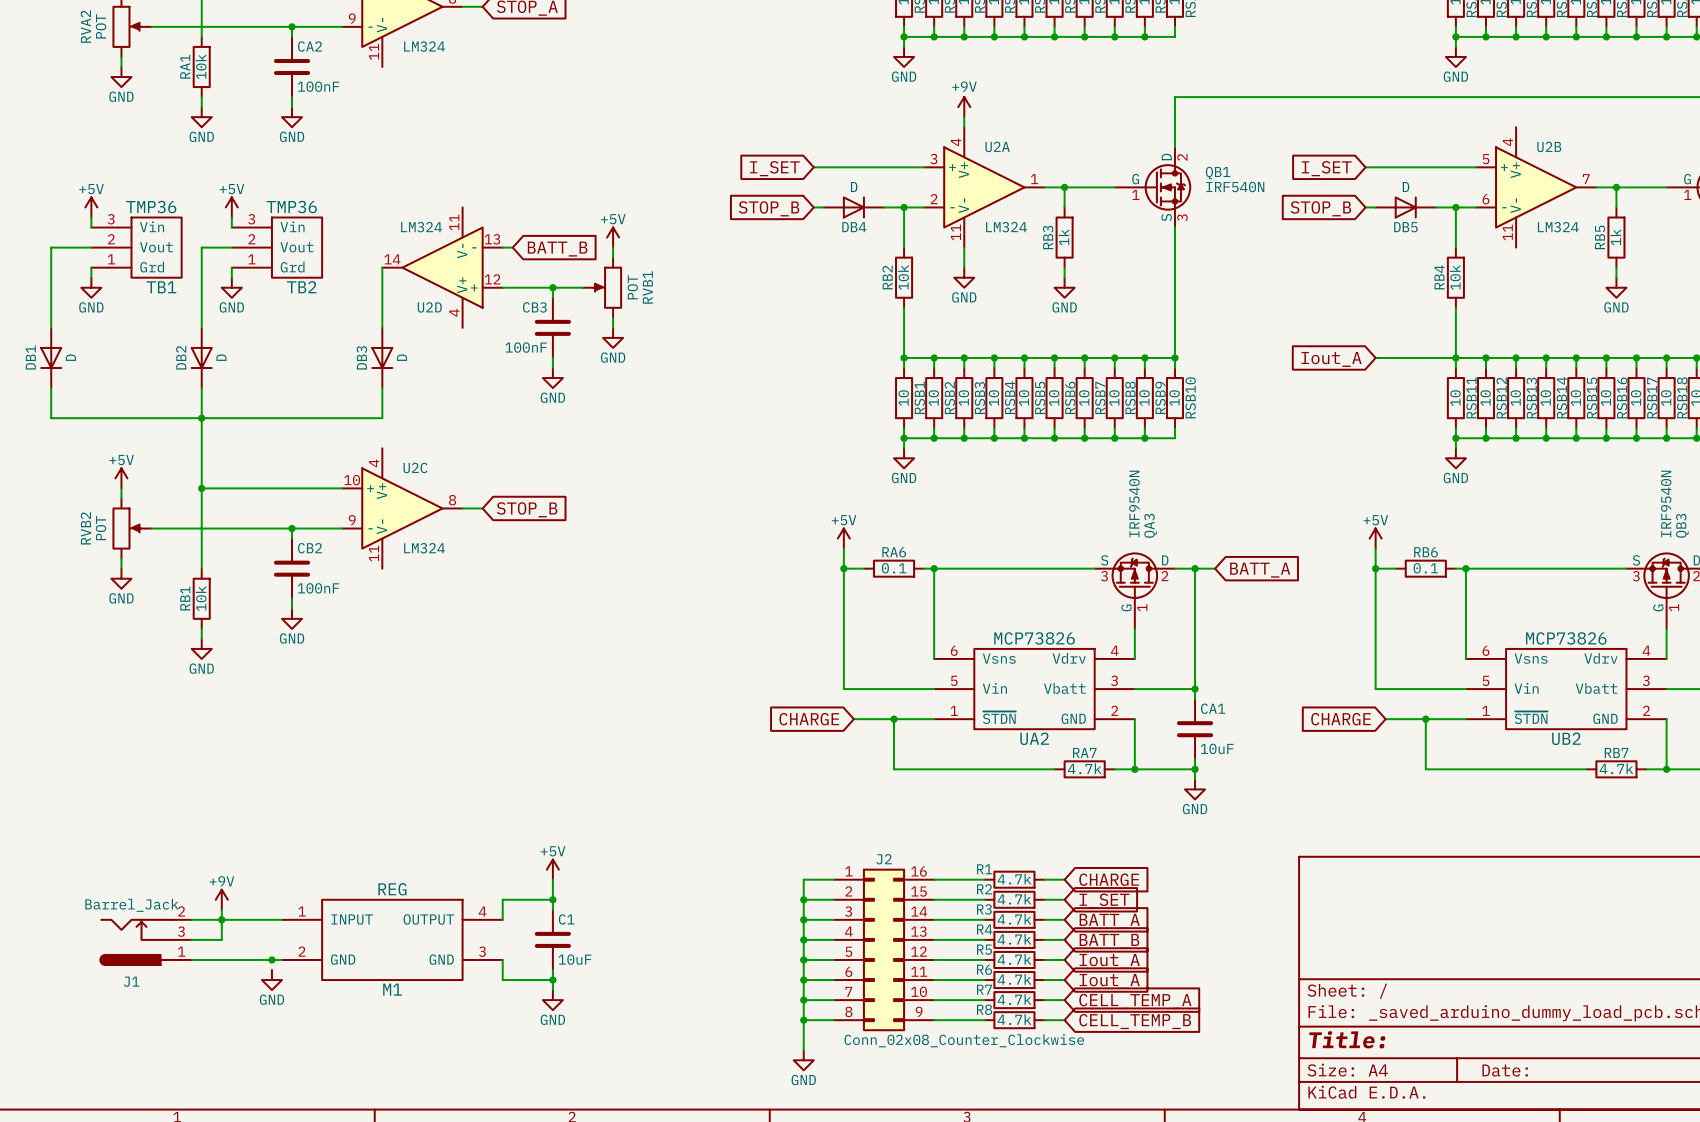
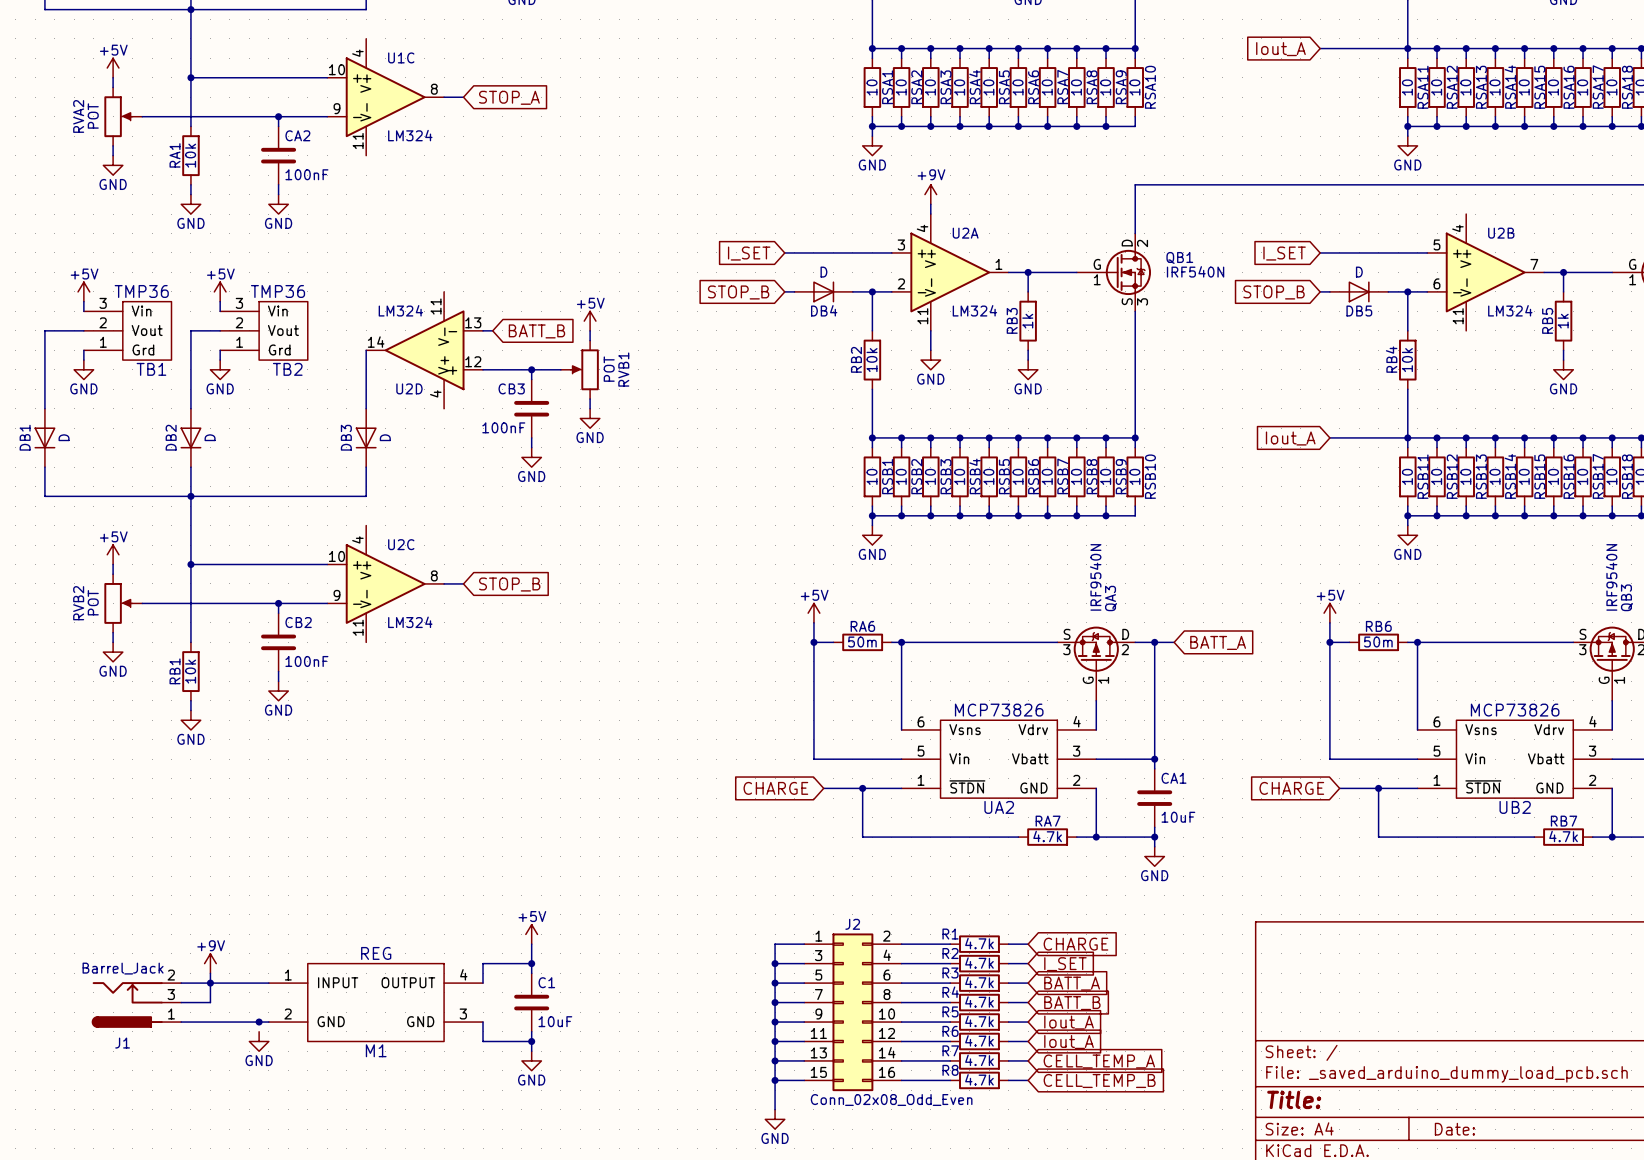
RA6 value: 0.1 (894, 568) -> 50m (862, 642)
RB6 value: 0.1 (1425, 568) -> 50m (1378, 642)
J2 symbol: [833, 868, 935, 1032] -> [804, 933, 902, 1092]
J2 value: Conn_02x08_Counter_Clockwise (964, 1040) -> Conn_02x08_Odd_Even (891, 1100)

